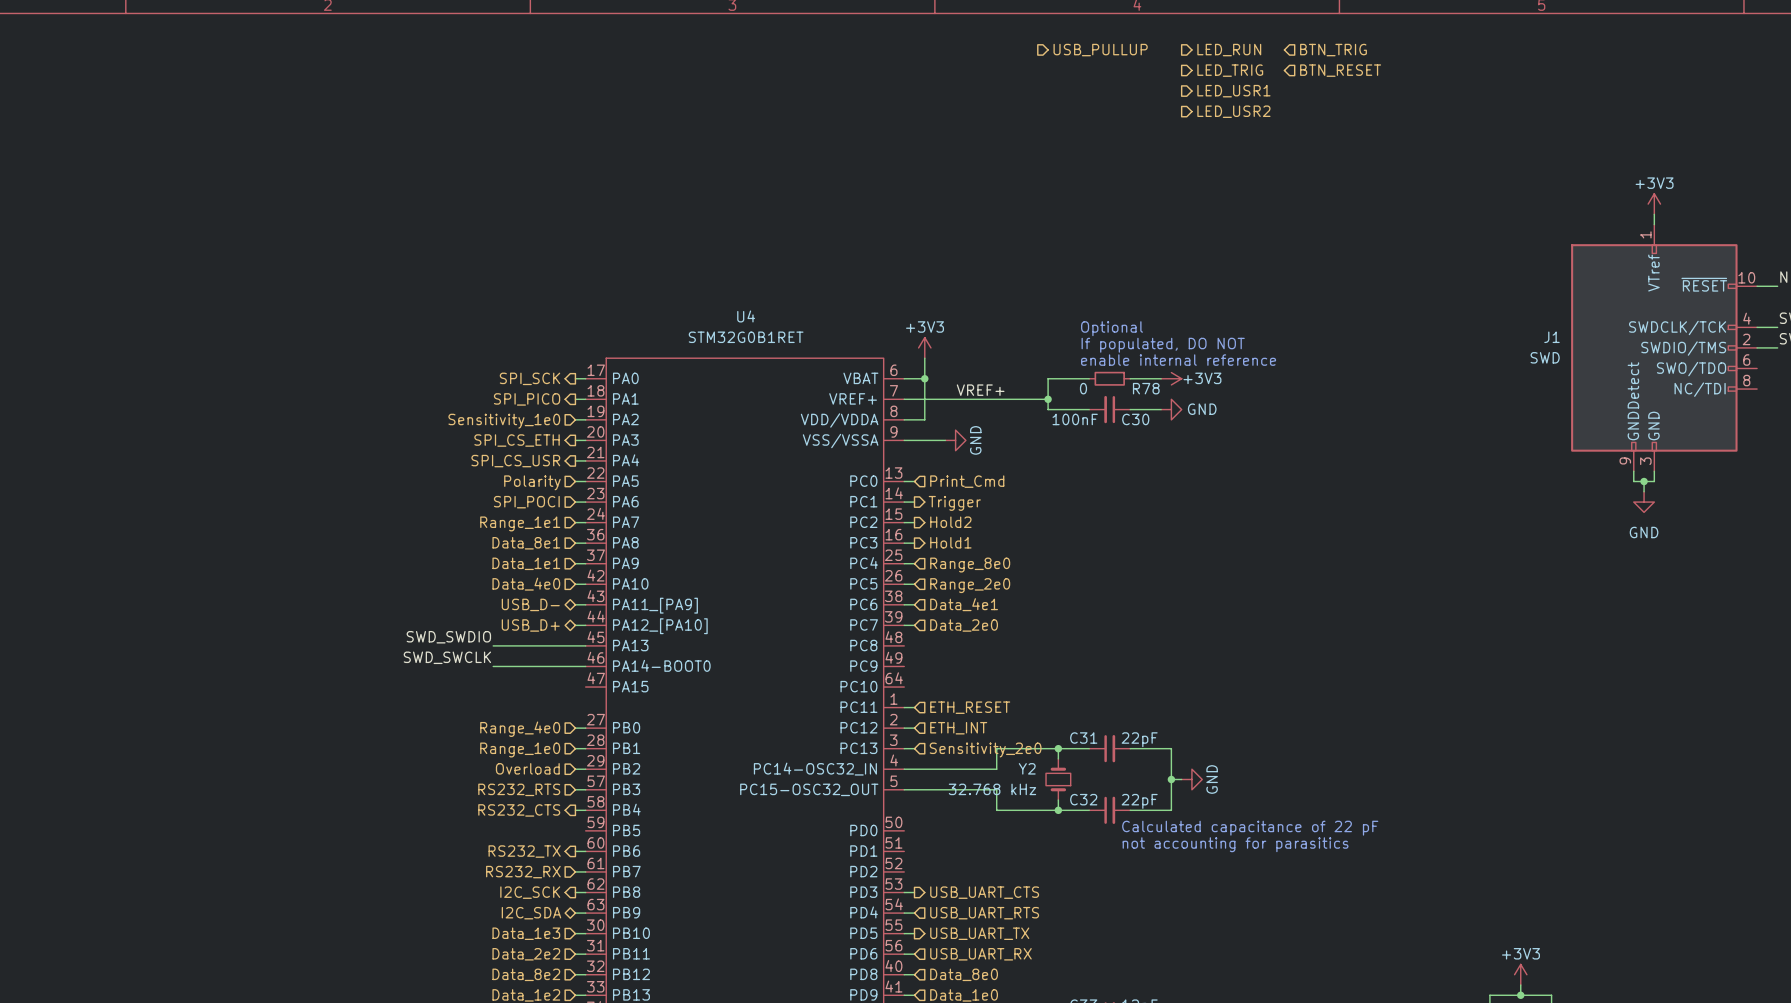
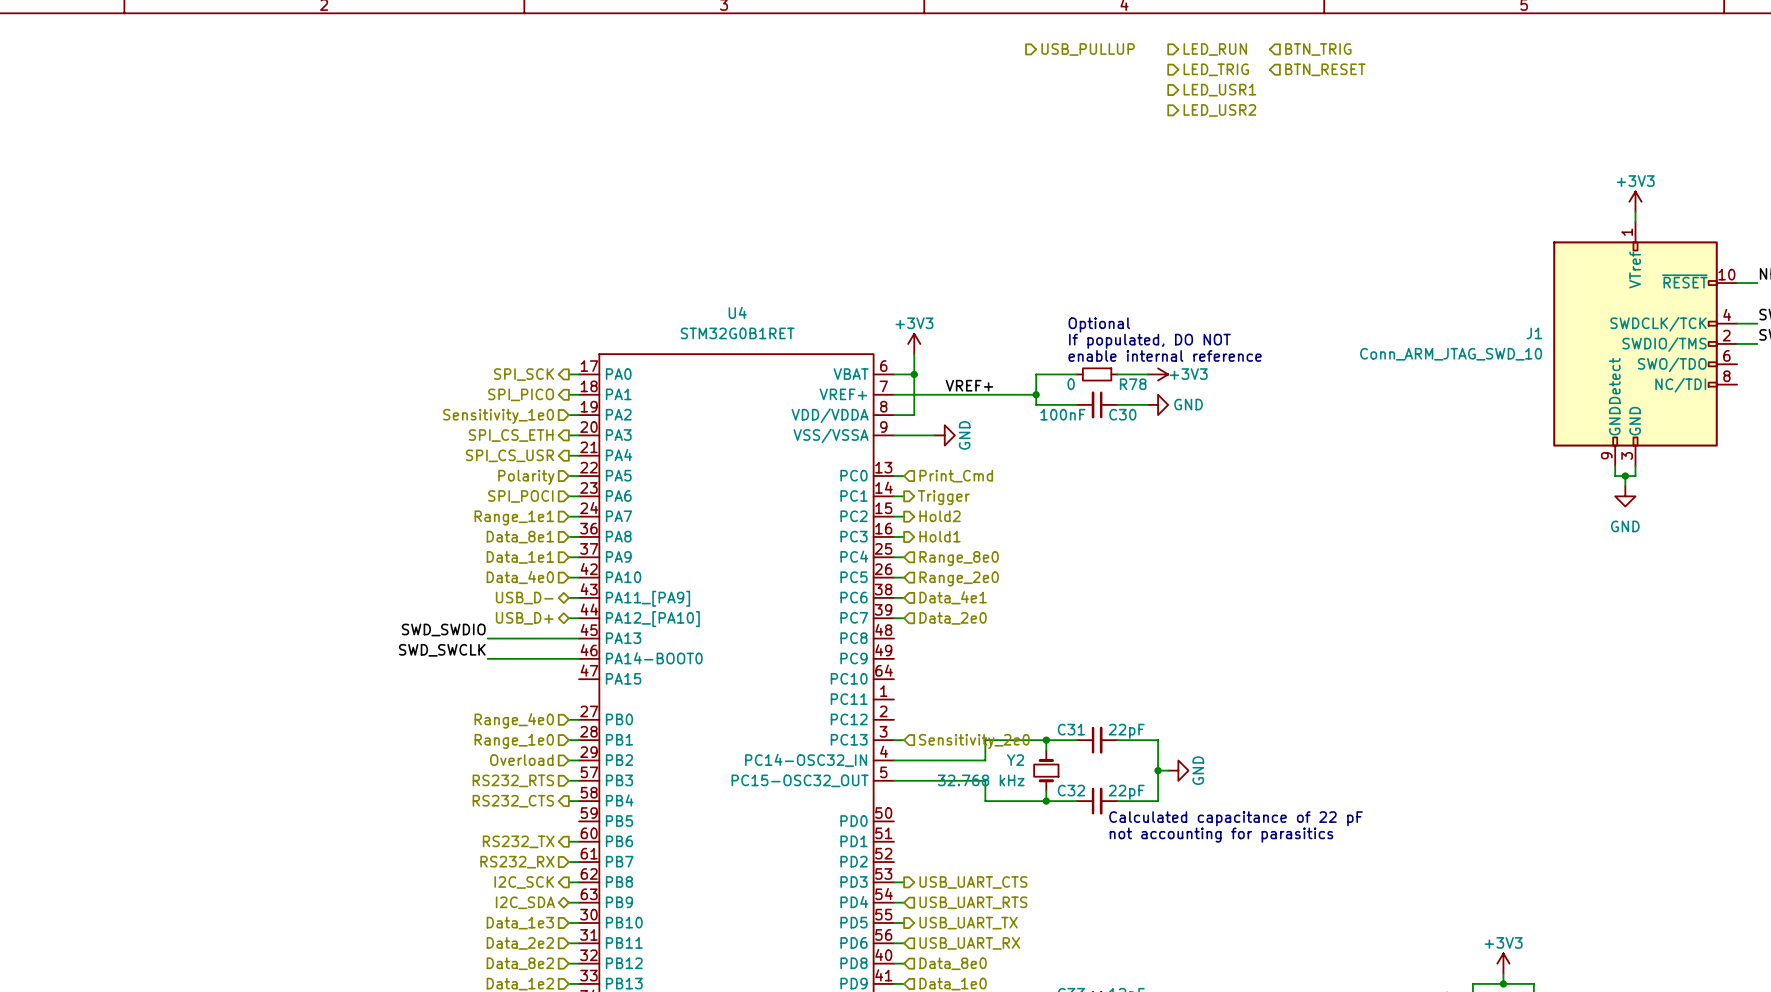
J1 value: SWD (1545, 357) -> Conn_ARM_JTAG_SWD_10 (1451, 354)
wire: (904, 707) (914, 707) -> none
hierarchical label: ETH_RESET (970, 707) -> none
wire: (904, 728) (914, 728) -> none
hierarchical label: ETH_INT (958, 728) -> none

